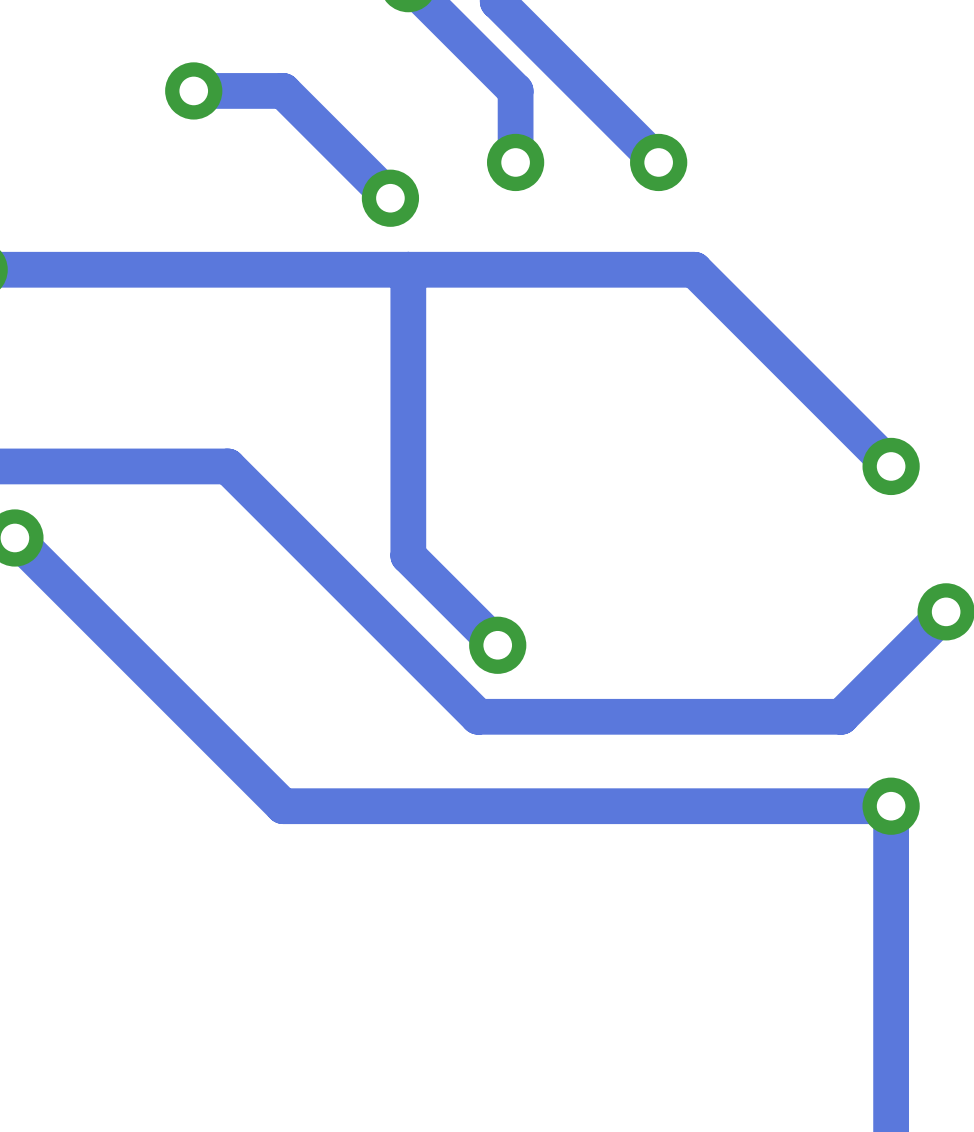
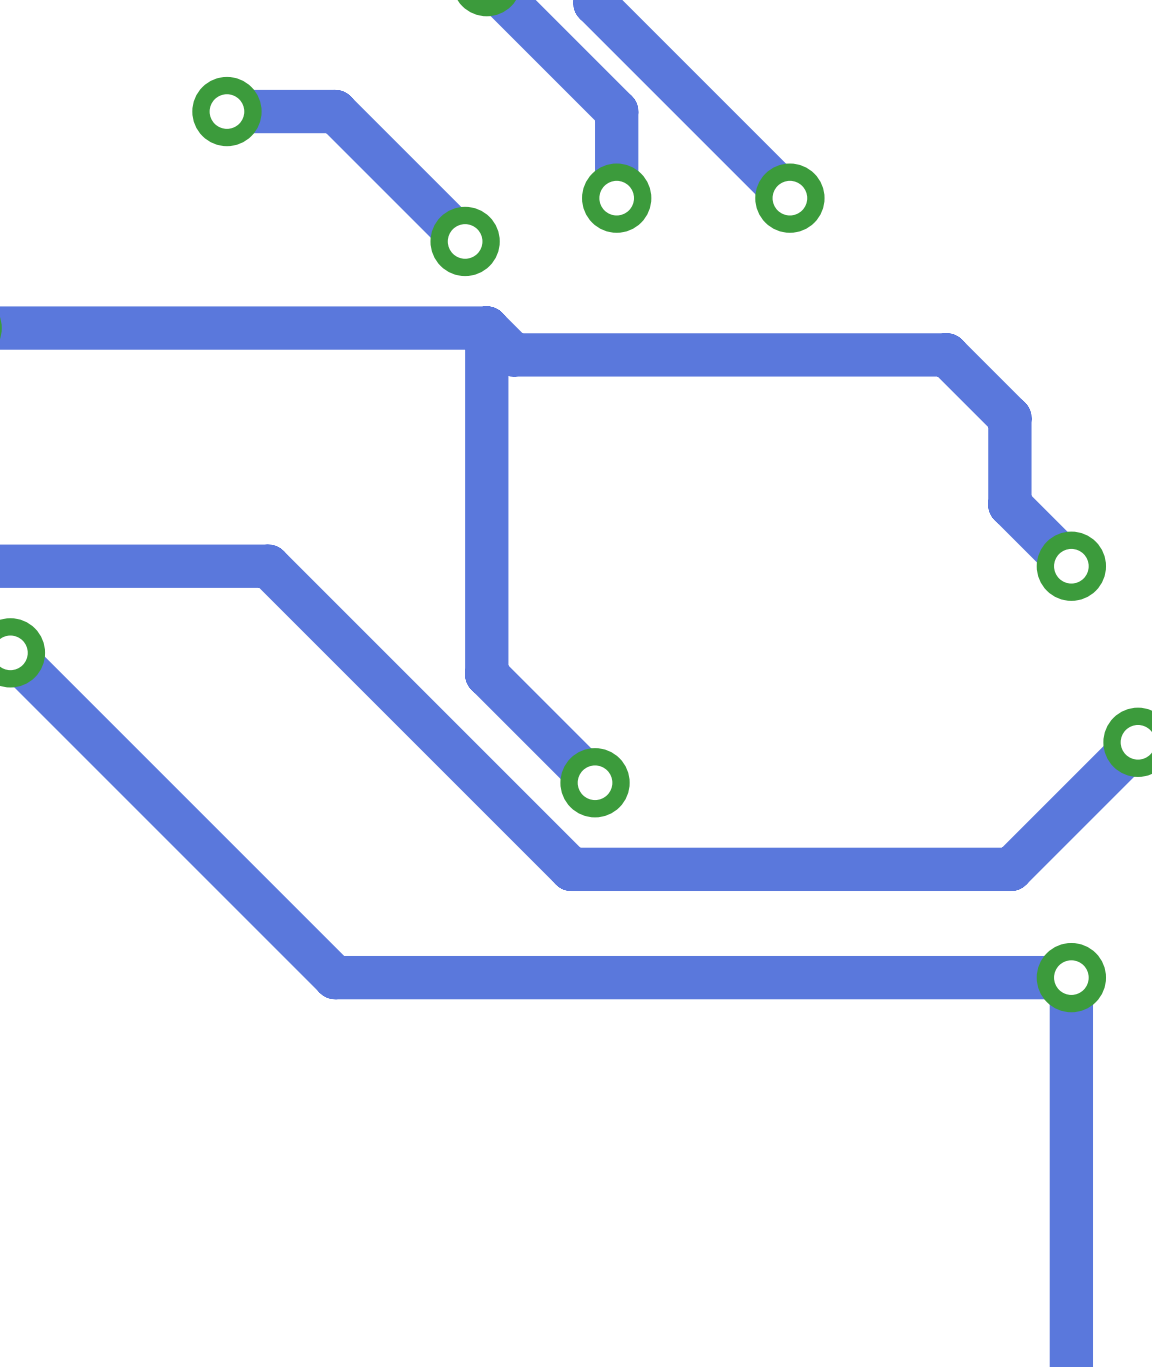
track: (408, 269) (694, 269) (840, 415) -> (486, 328) (513, 354) (946, 354) (1009, 418) (1009, 504)

